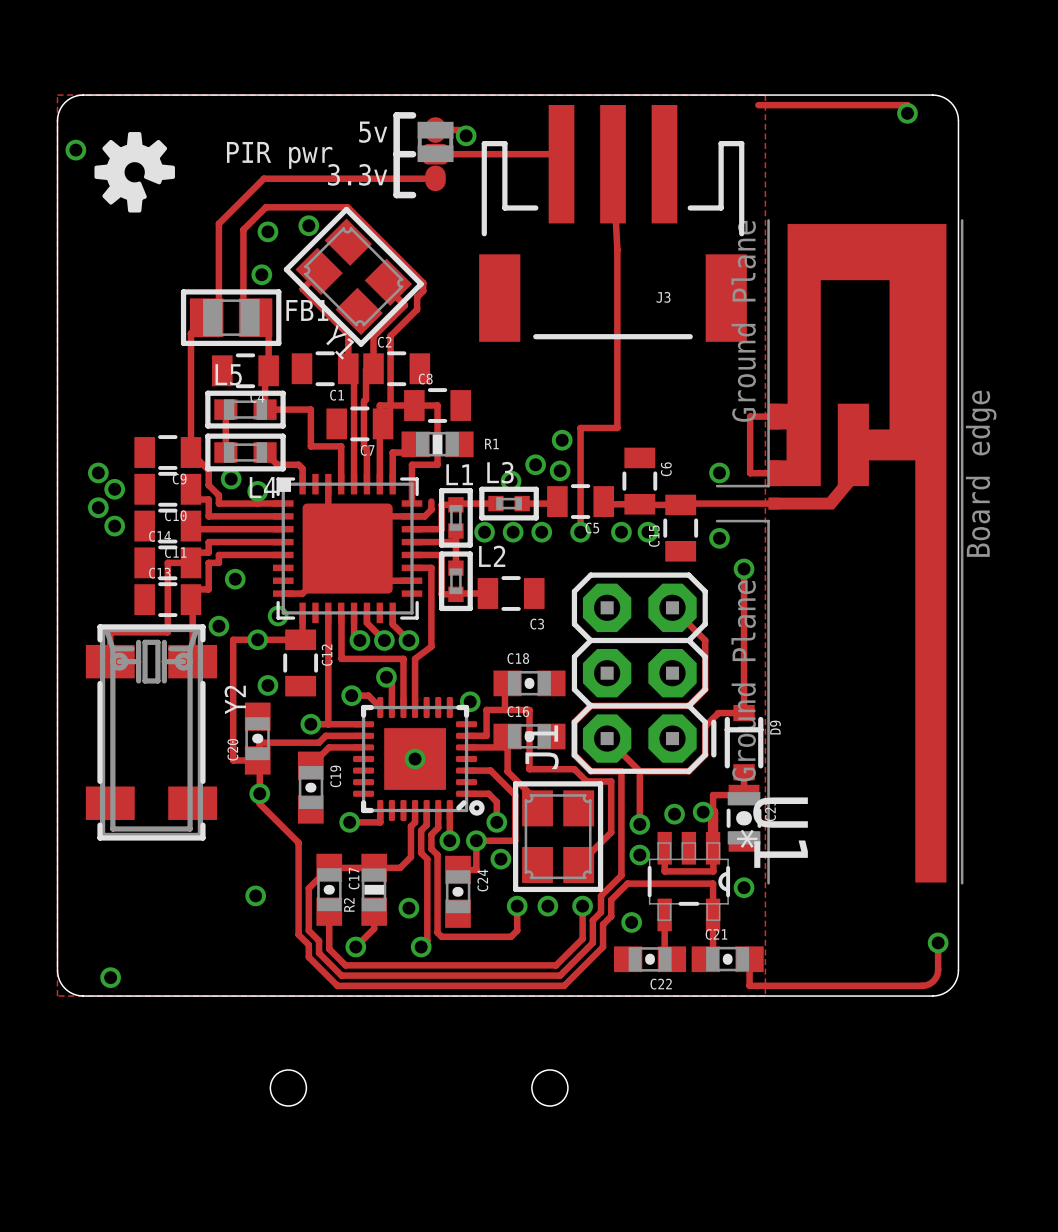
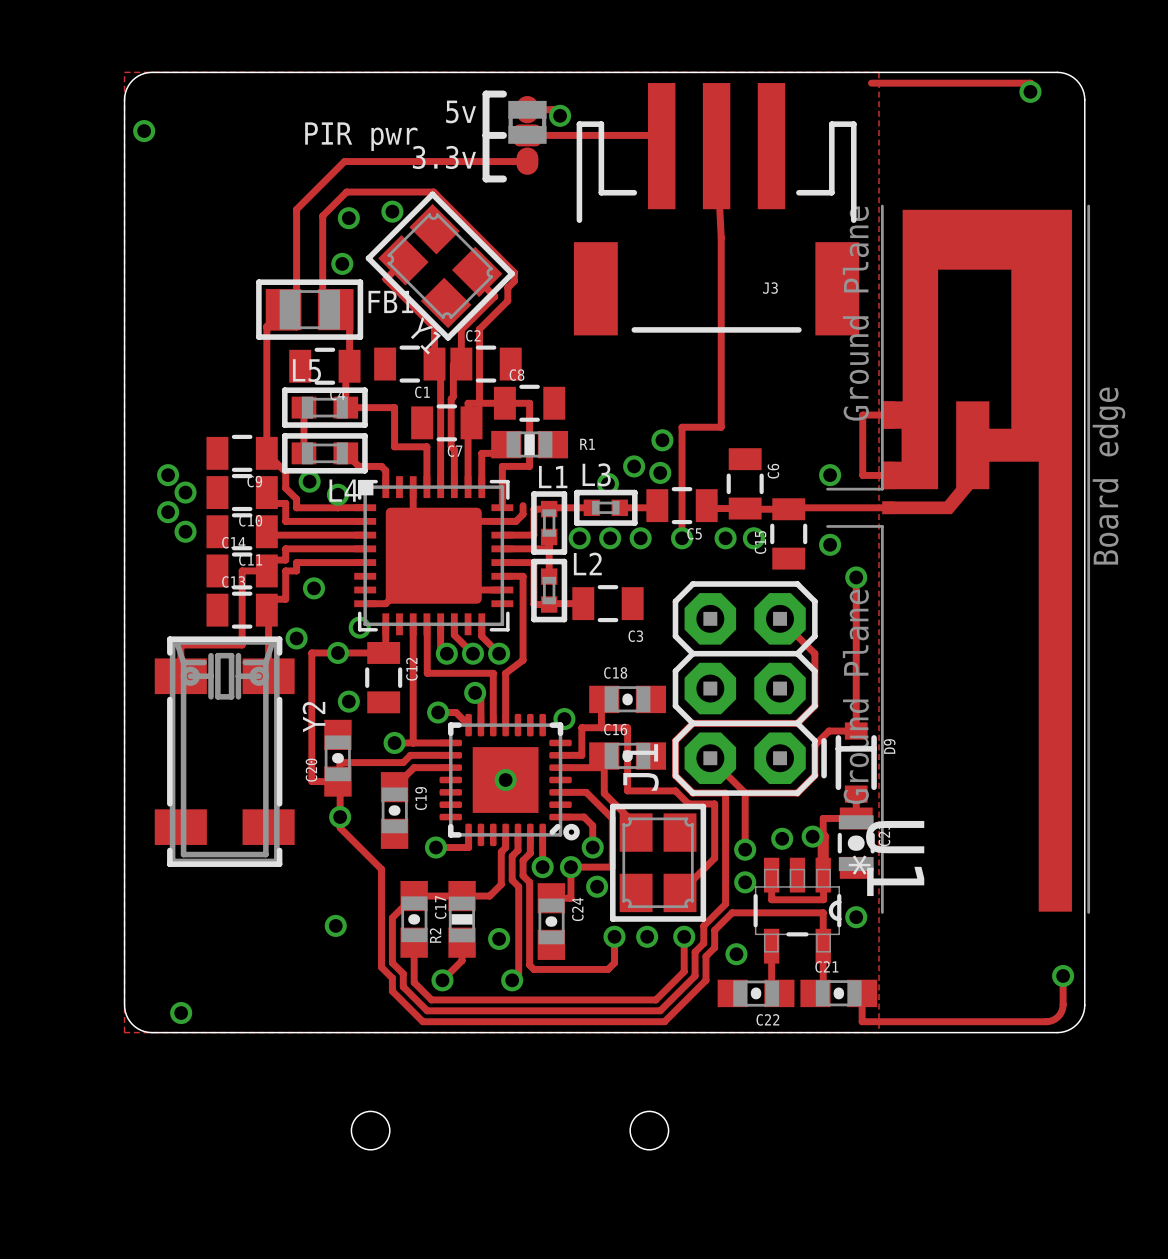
drawing: [94, 132, 175, 213] -> none

